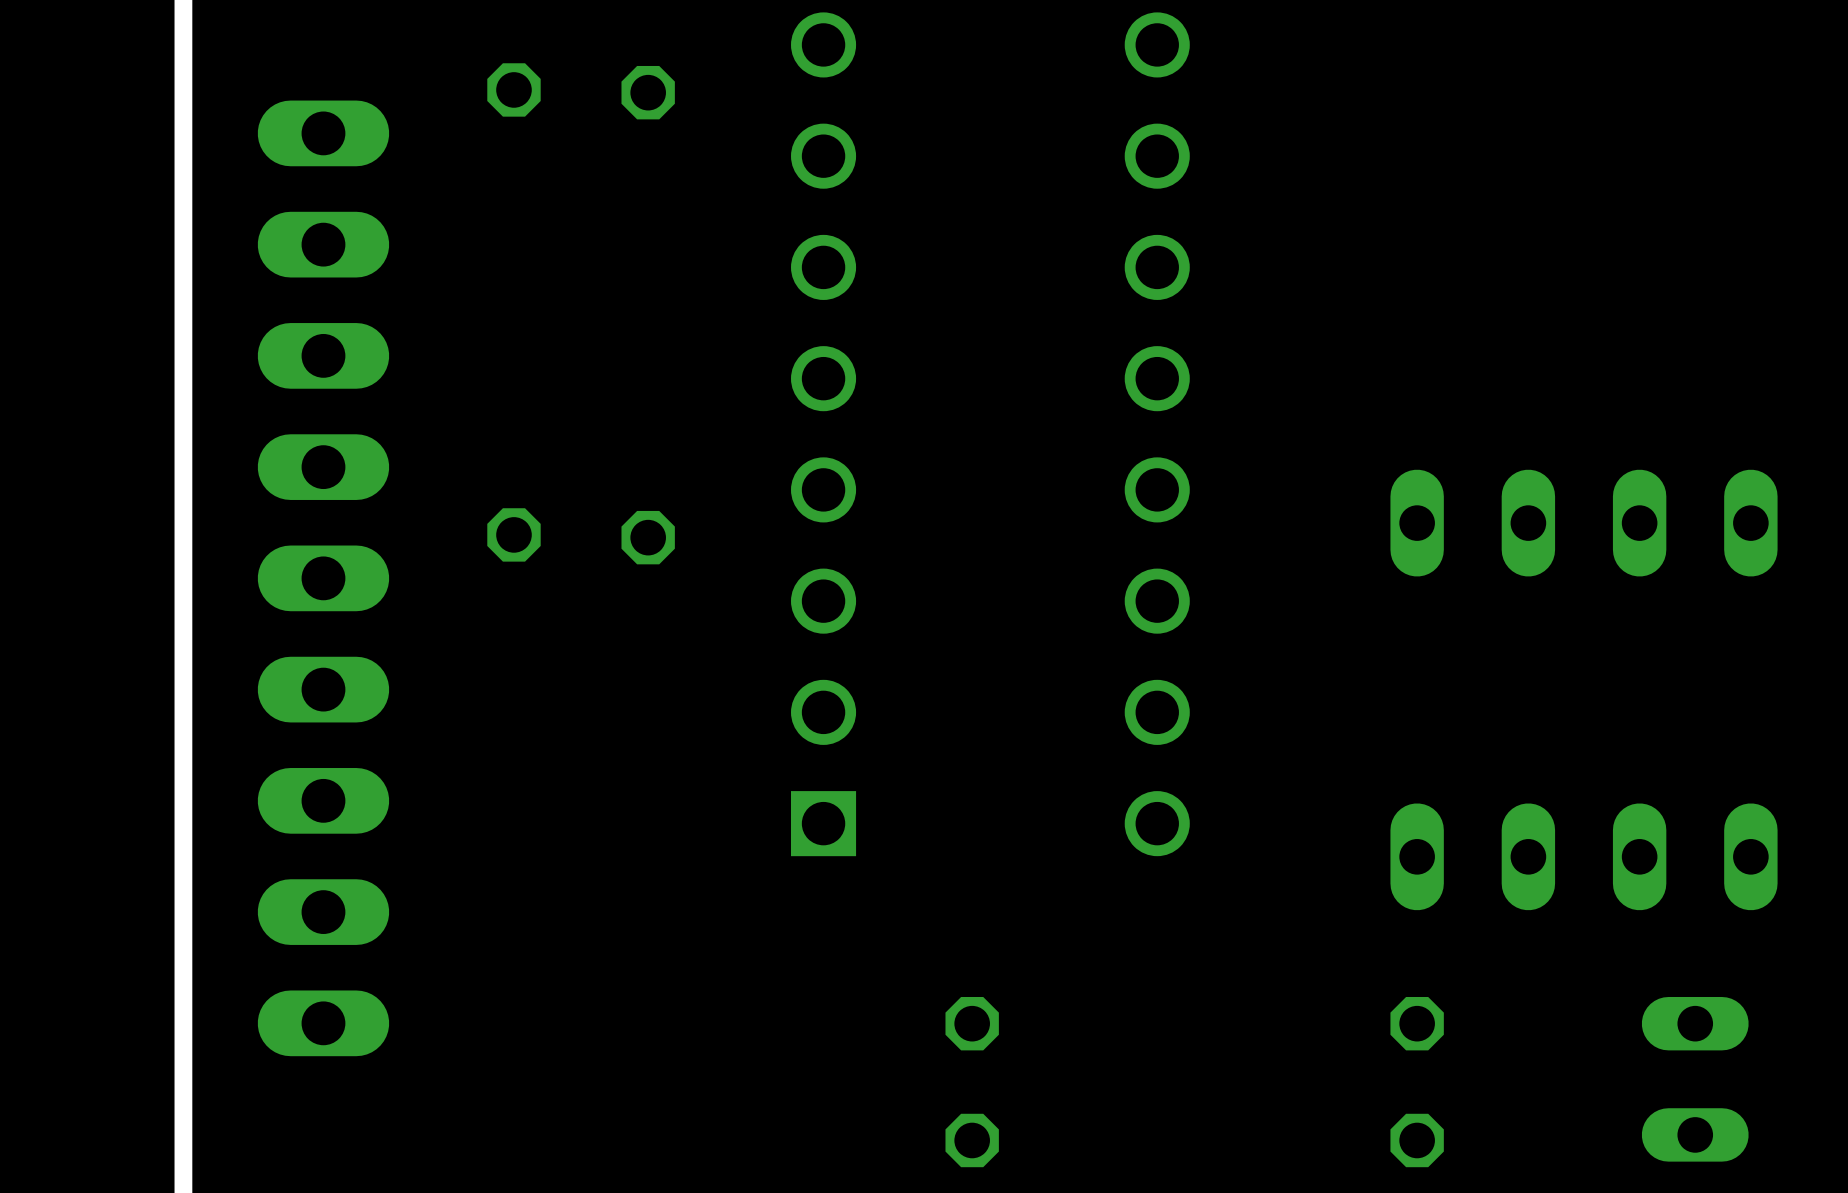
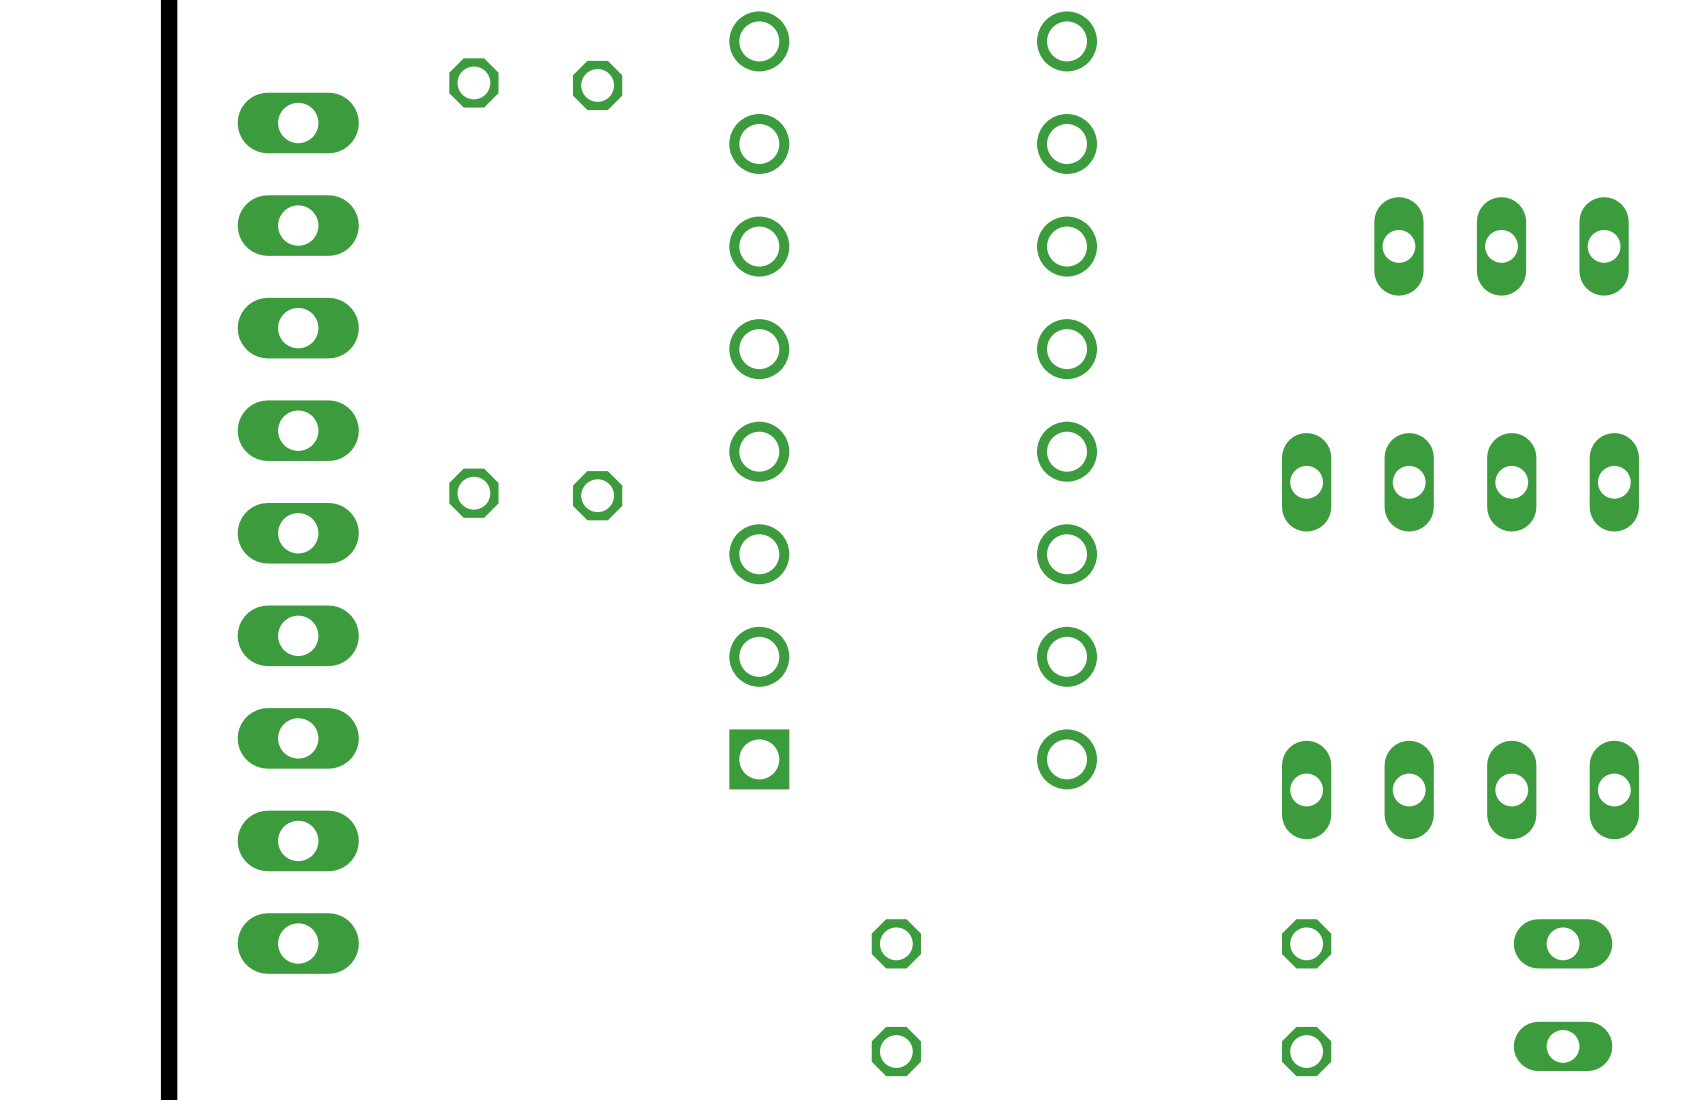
part: none -> (1501, 246)

